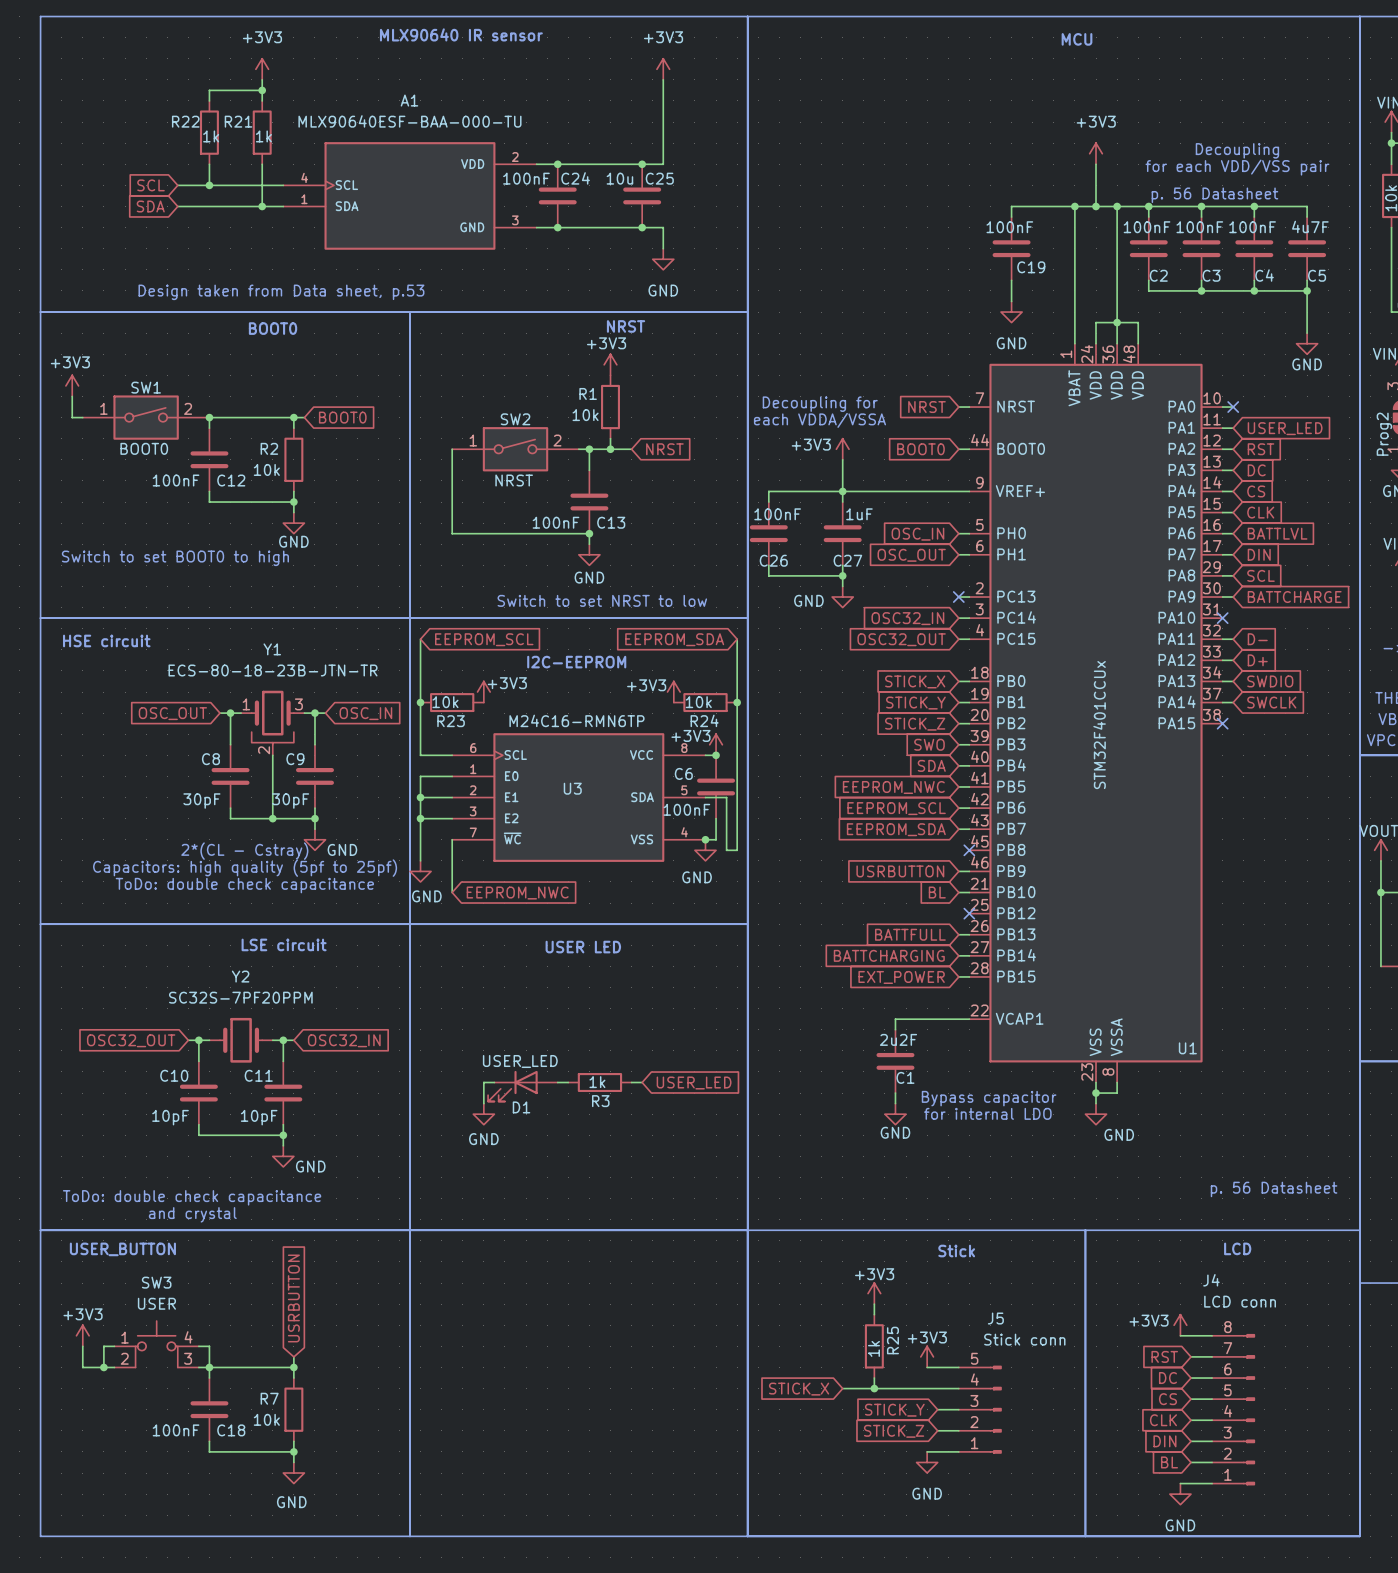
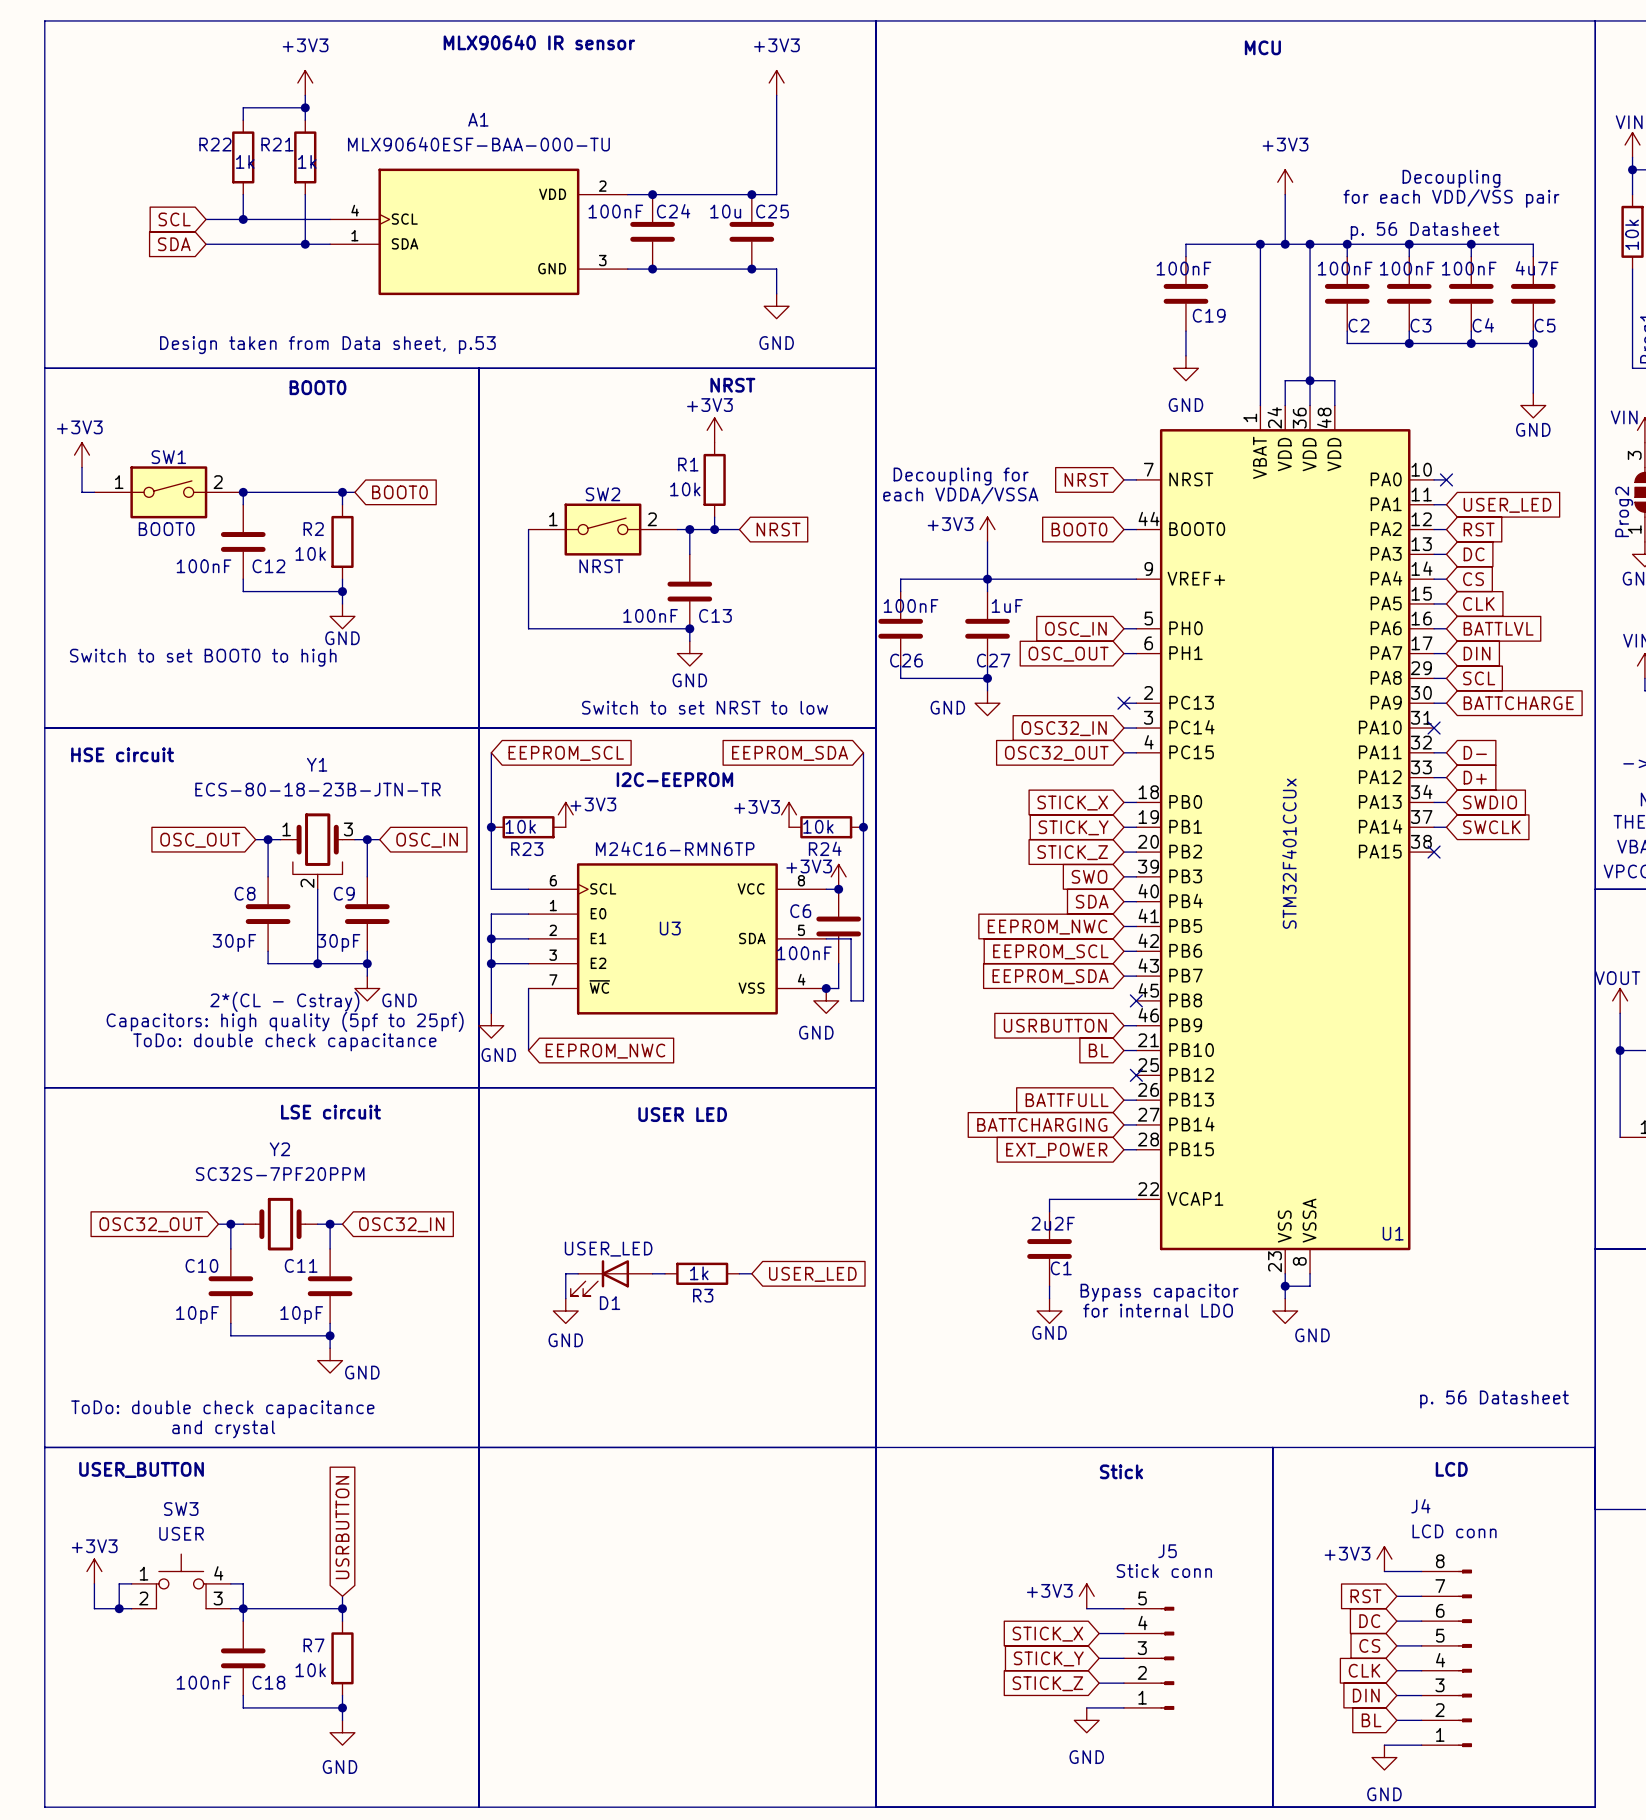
power symbol: +3V3 (874, 1293) -> none
wire: (874, 1304) (874, 1314) -> none
power symbol text position: +3V3 (927, 1337) -> +3V3 (1049, 1590)
J5 value position: Stick conn (1024, 1339) -> Stick conn (1164, 1571)
R25: 1k (874, 1346) -> none
wire: (874, 1378) (874, 1388) -> none
wire: (842, 1388) (937, 1388) -> none
junction: (874, 1388) -> none
global label position: STICK_X (799, 1389) -> STICK_X (1047, 1634)

